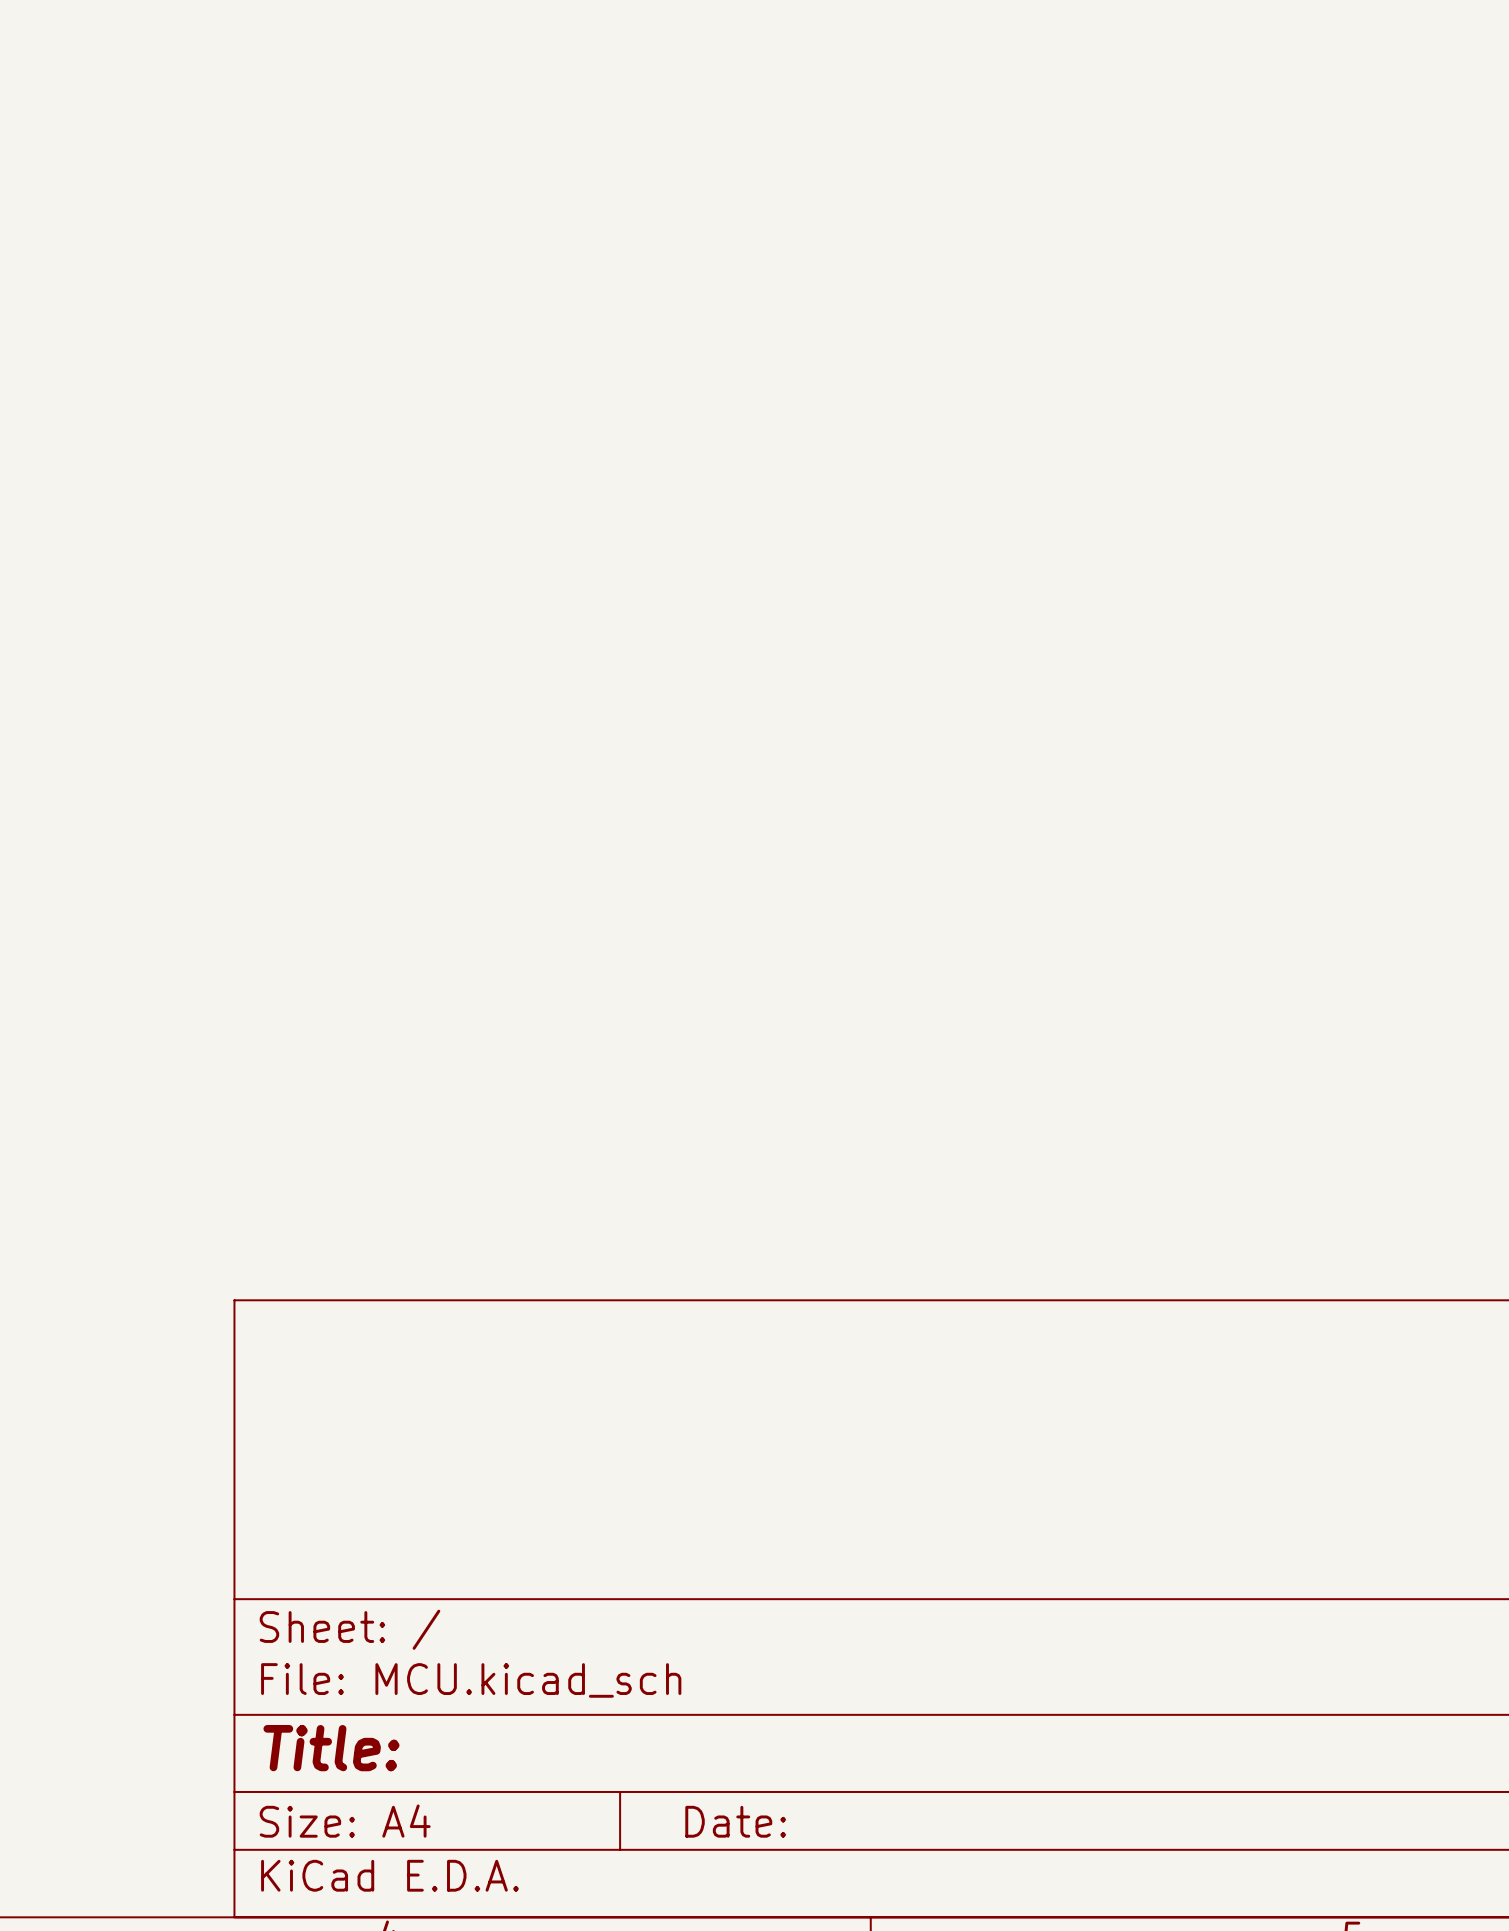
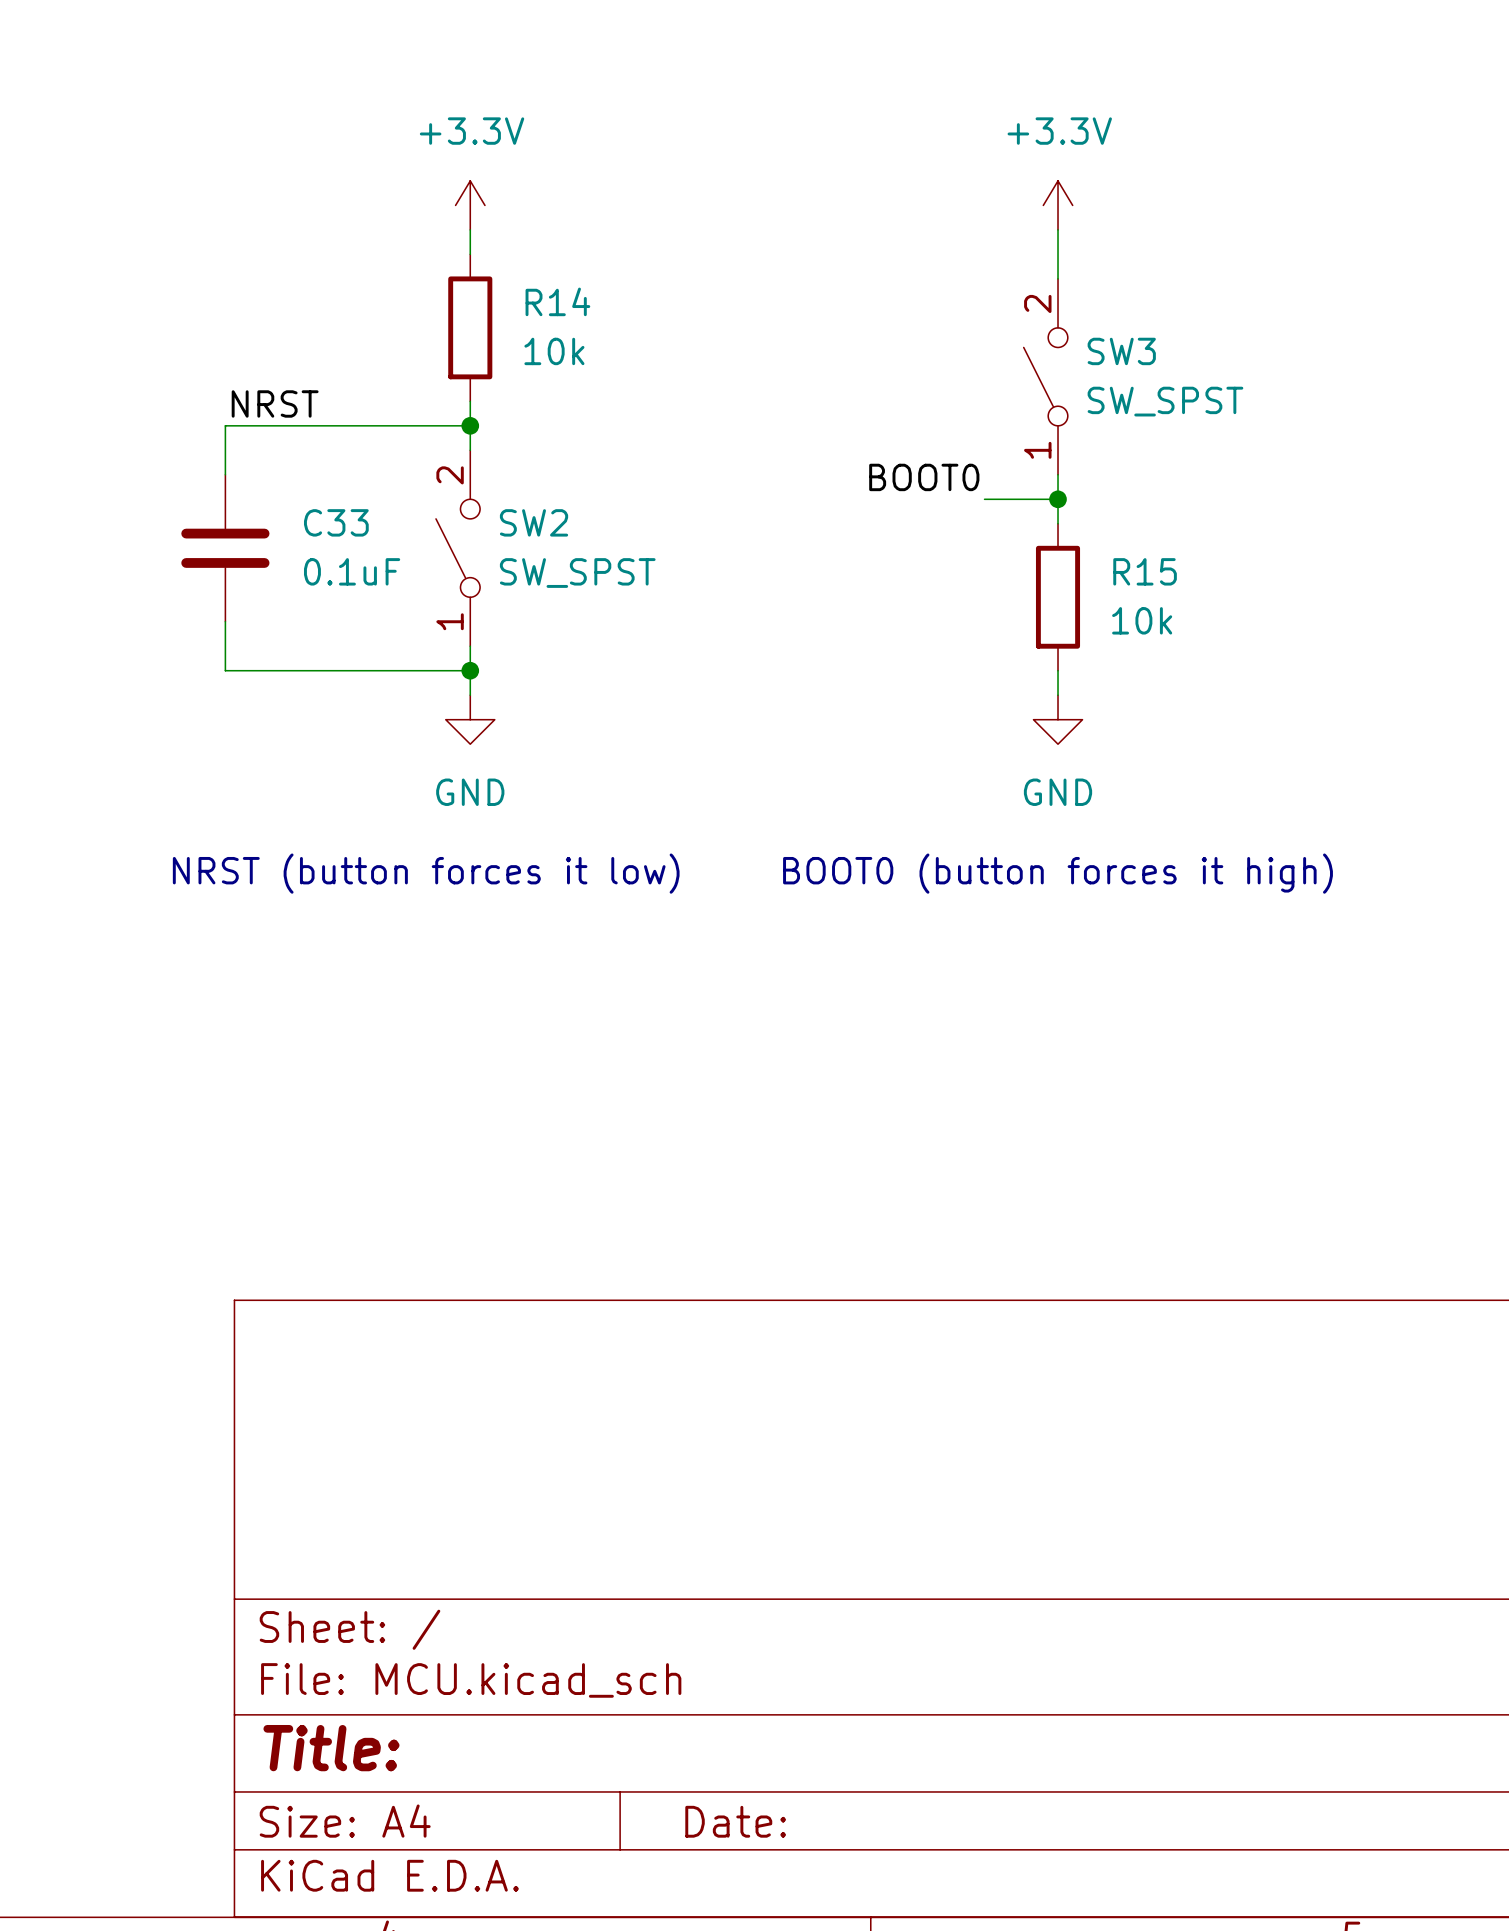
power symbol: none -> +3.3V (470, 205)
power symbol: none -> +3.3V (1058, 205)
wire: none -> (470, 229) (470, 254)
wire: none -> (1058, 229) (1058, 278)
R14: none -> 10k (470, 327)
SW3: none -> SW_SPST (1045, 376)
wire: none -> (470, 401) (470, 450)
label: none -> NRST (275, 403)
wire: none -> (470, 425) (225, 425) (225, 474)
junction: none -> (470, 425)
wire: none -> (1058, 474) (1058, 523)
label: none -> BOOT0 (924, 477)
wire: none -> (984, 499) (1058, 499)
junction: none -> (1058, 499)
C33: none -> 0.1uF (225, 548)
SW2: none -> SW_SPST (458, 548)
R15: none -> 10k (1058, 597)
wire: none -> (225, 621) (225, 670) (470, 670)
wire: none -> (470, 646) (470, 695)
junction: none -> (470, 670)
wire: none -> (1058, 670) (1058, 695)
power symbol: none -> GND (470, 719)
power symbol: none -> GND (1058, 719)
text: none -> NRST (button forces it low) (426, 873)
text: none -> BOOT0 (button forces it high) (1058, 873)

